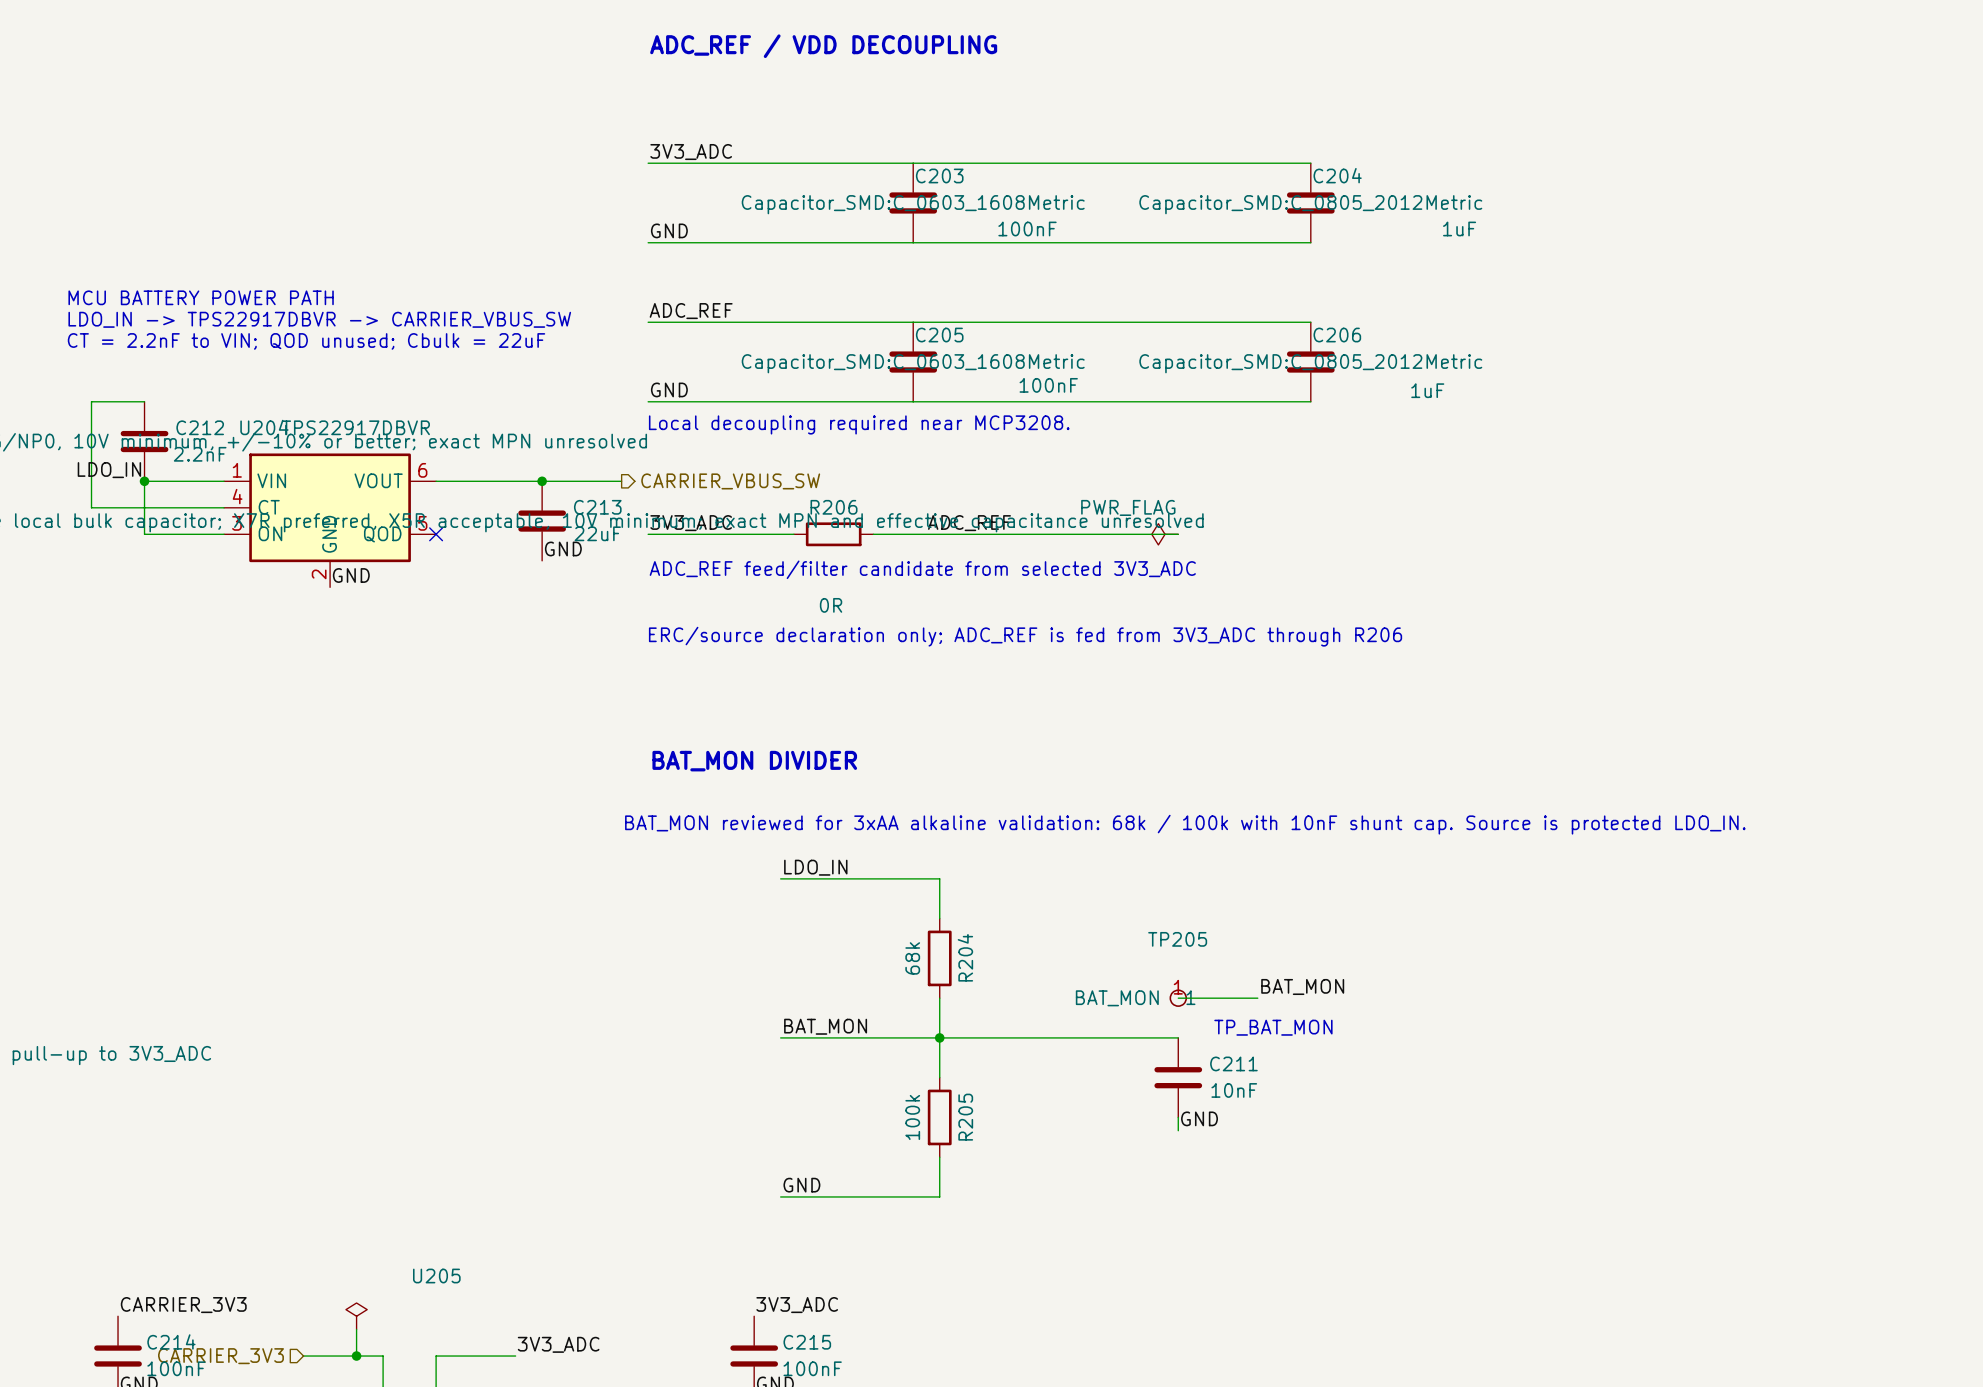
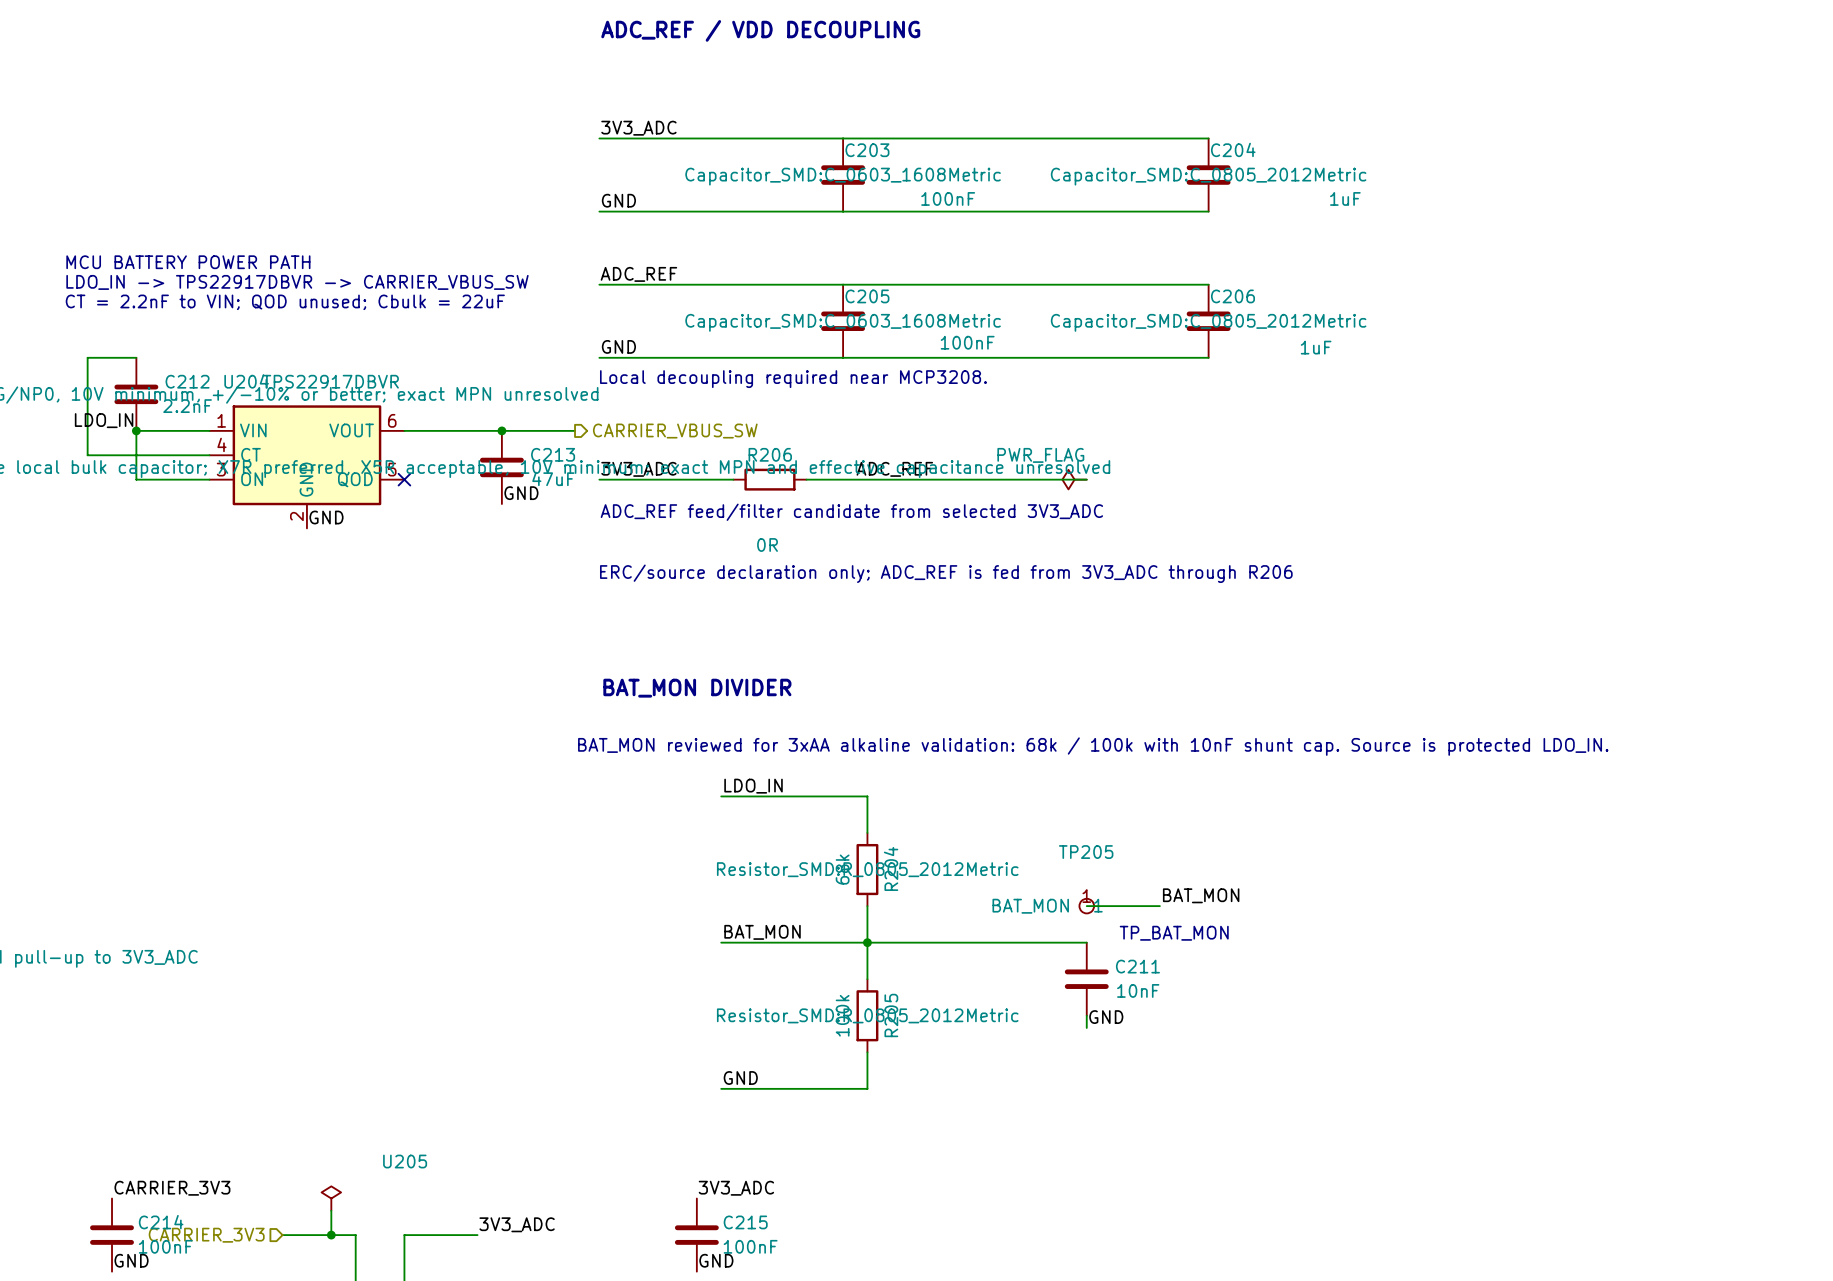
C213 value: 22uF (597, 533) -> 47uF (553, 478)
R204 text: none -> Resistor_SMD:R_0805_2012Metric (867, 869)
R205 text: none -> Resistor_SMD:R_0805_2012Metric (867, 1015)

